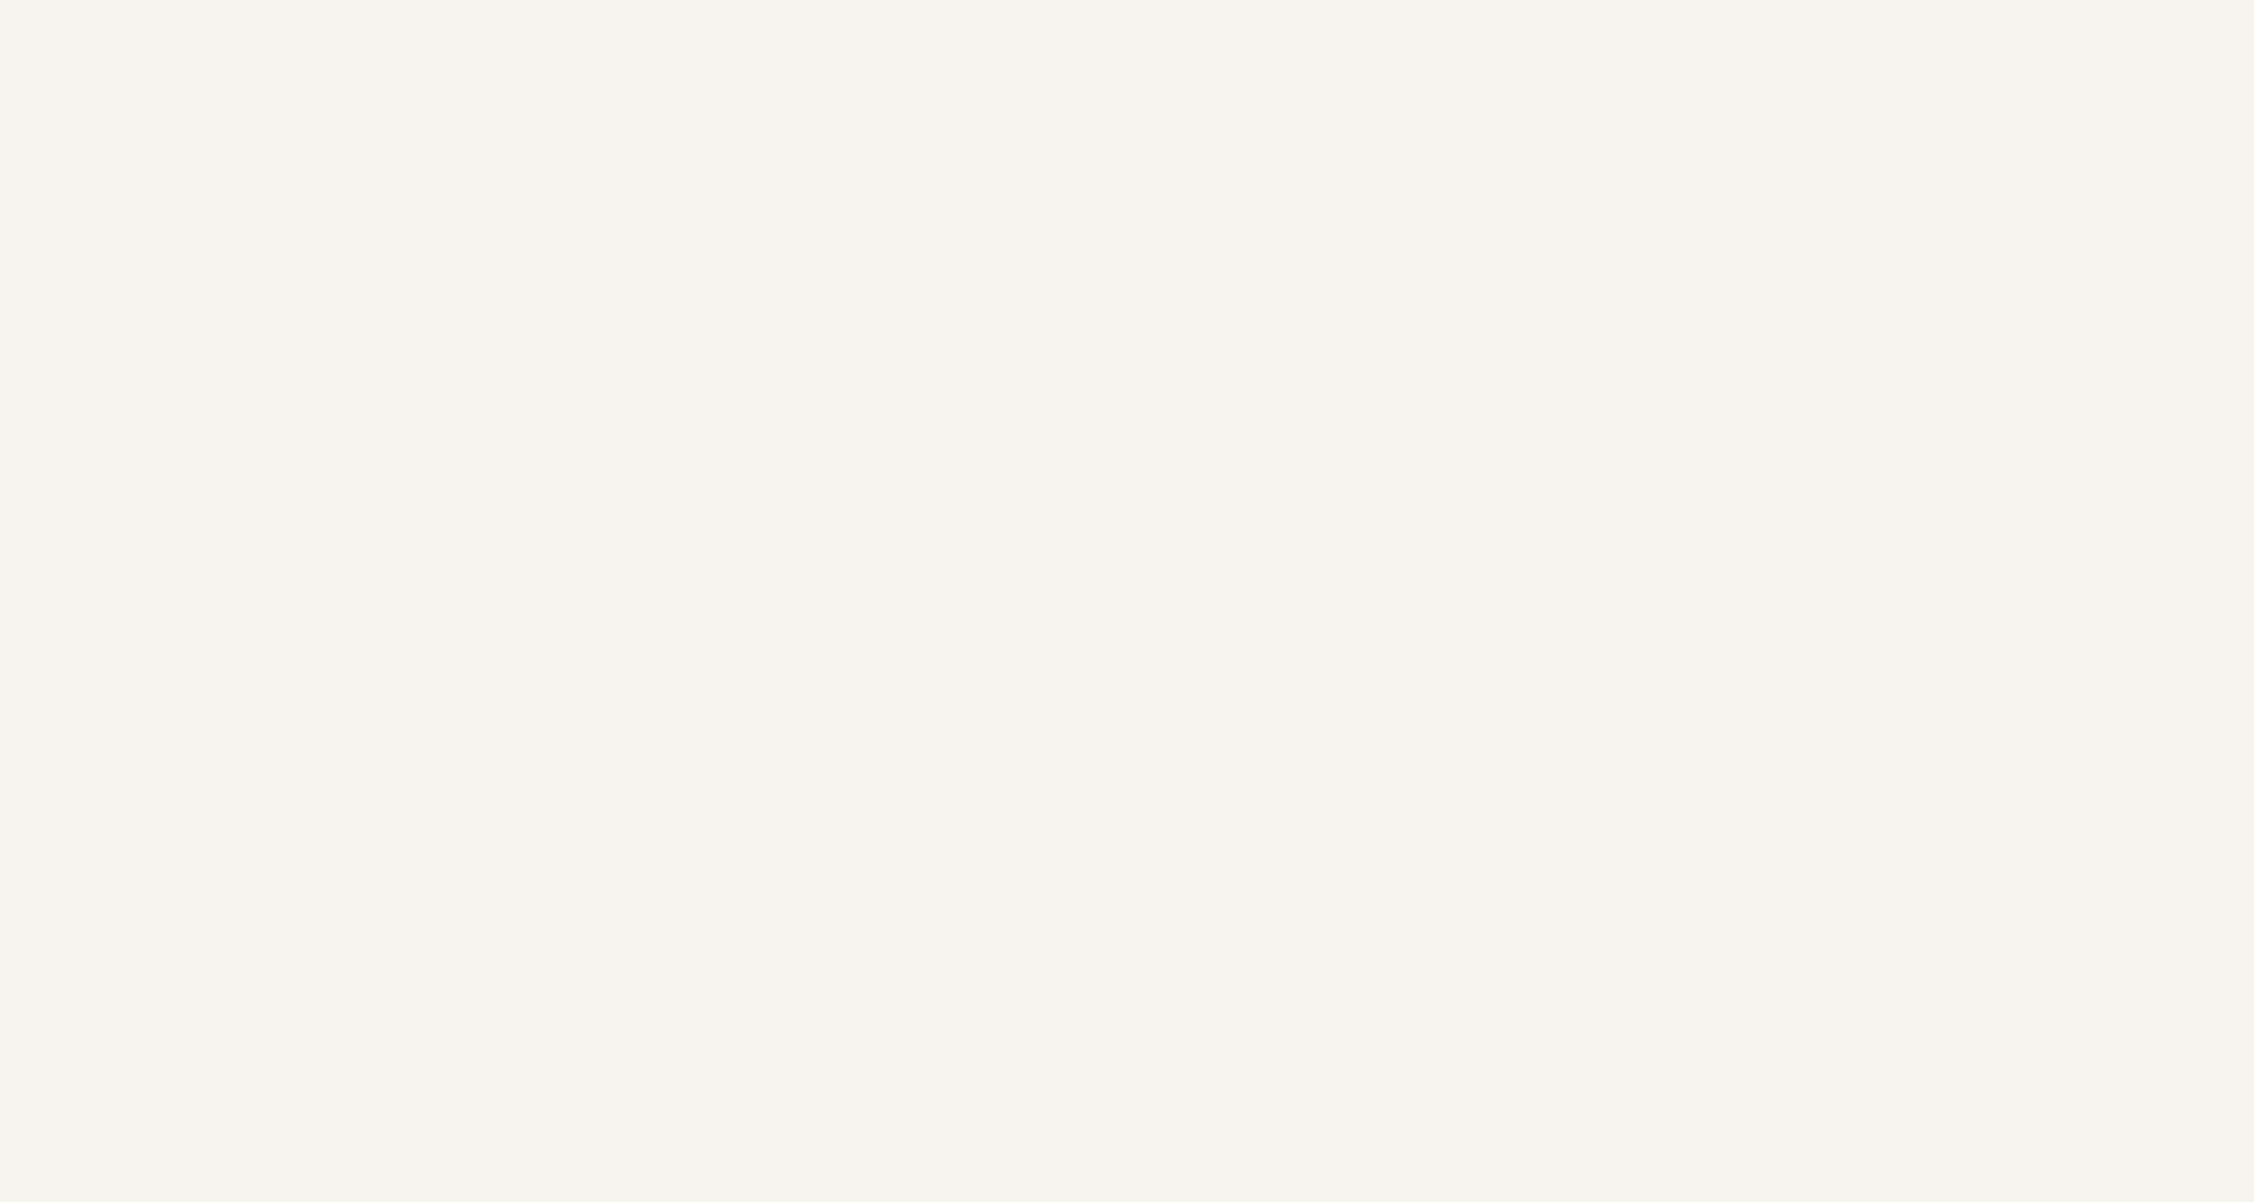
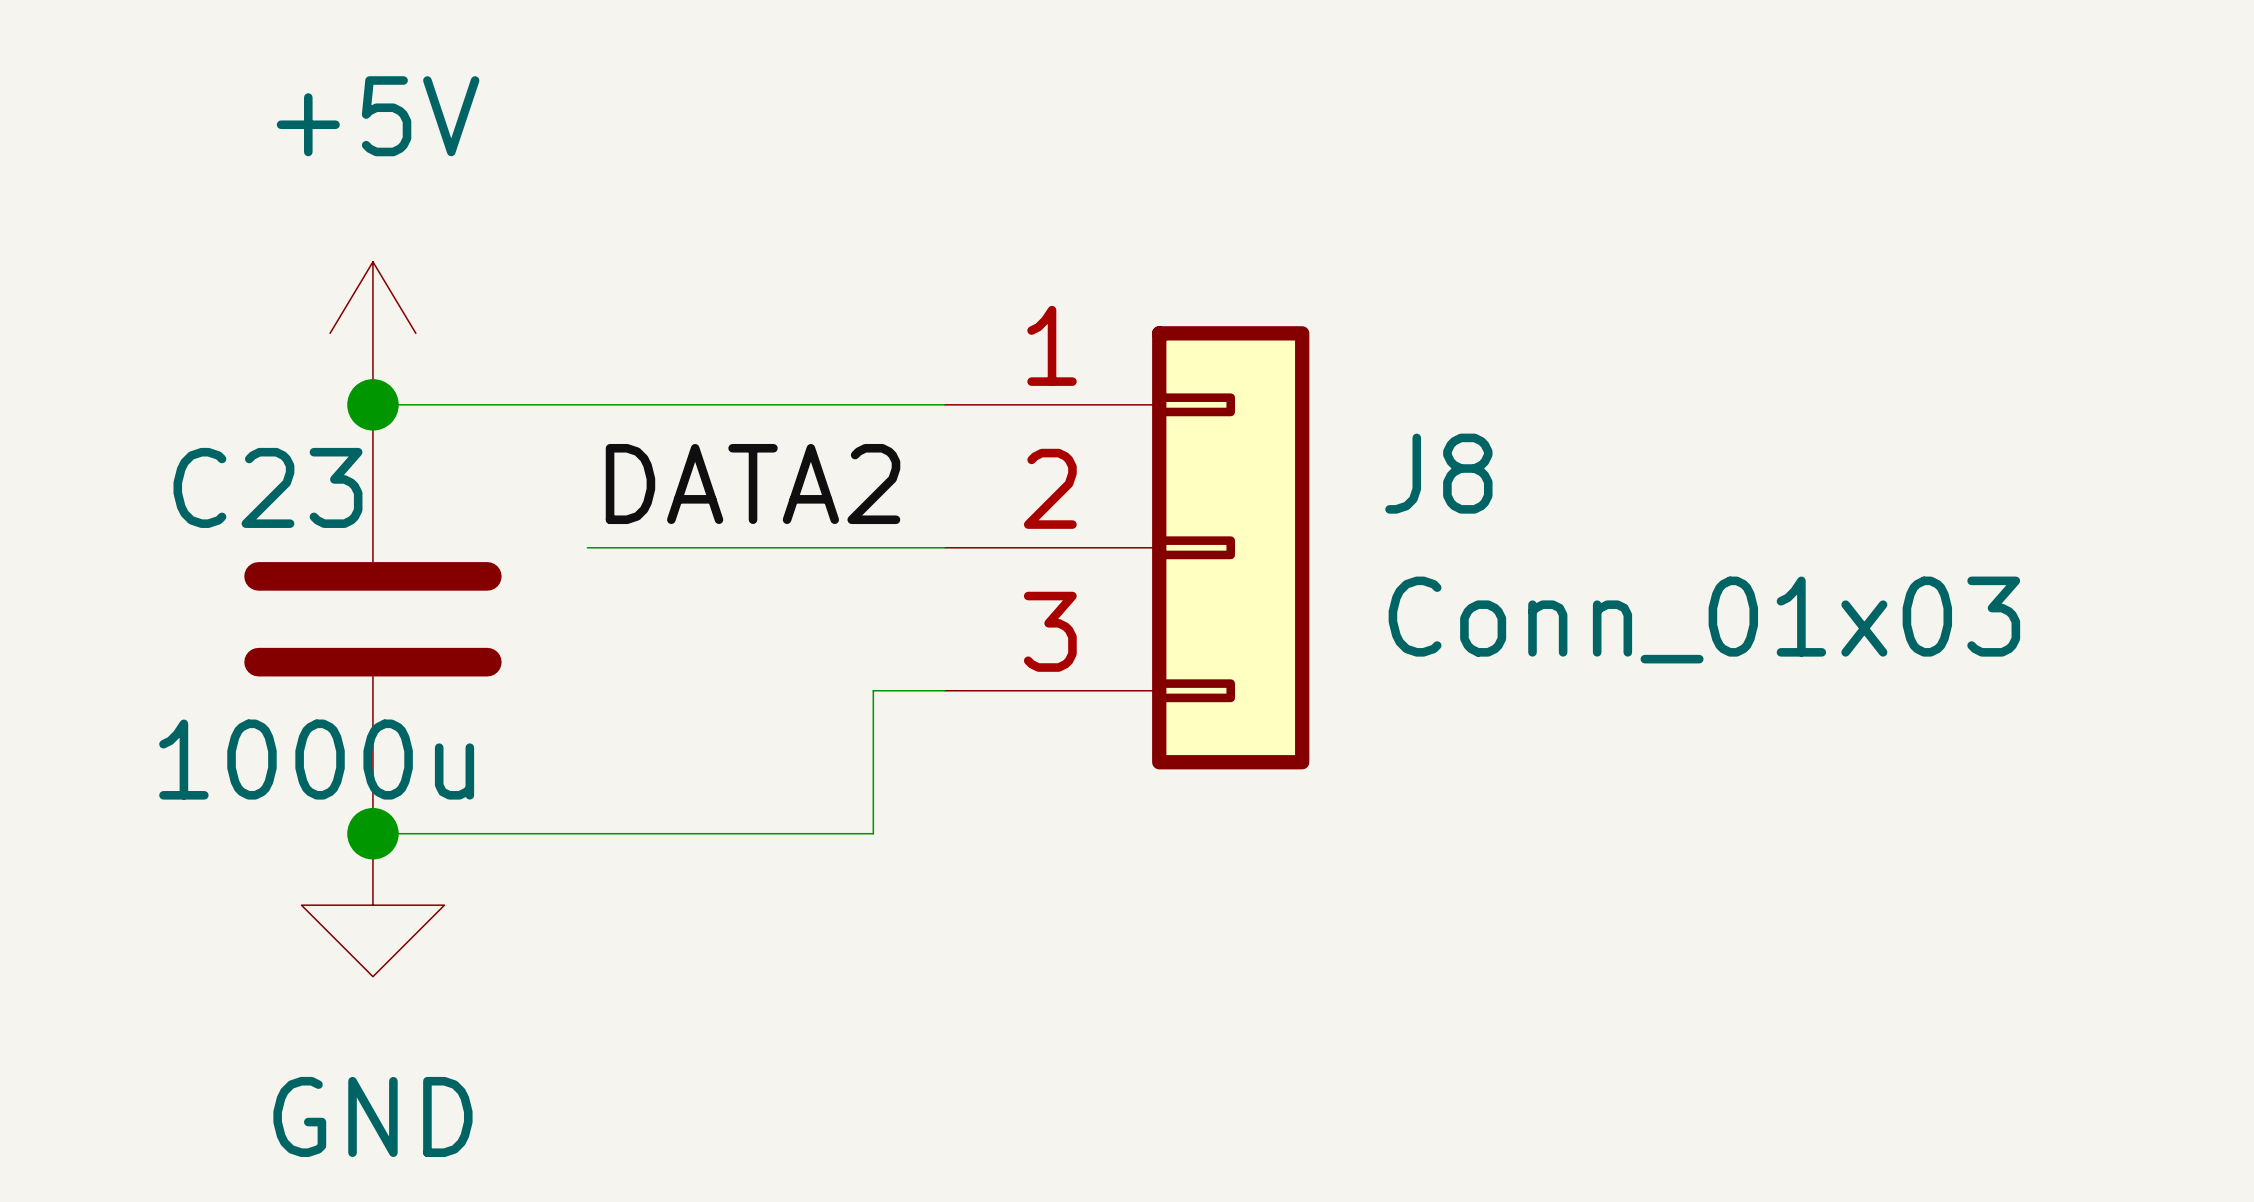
power symbol: none -> +5V (372, 333)
wire: none -> (372, 404) (944, 404)
junction: none -> (372, 404)
label: none -> DATA2 (753, 484)
wire: none -> (587, 547) (944, 547)
J8: none -> Conn_01x03 (1127, 547)
C23: none -> 1000u (372, 619)
wire: none -> (944, 690) (873, 690) (873, 833) (372, 833)
junction: none -> (372, 833)
power symbol: none -> GND (372, 905)

